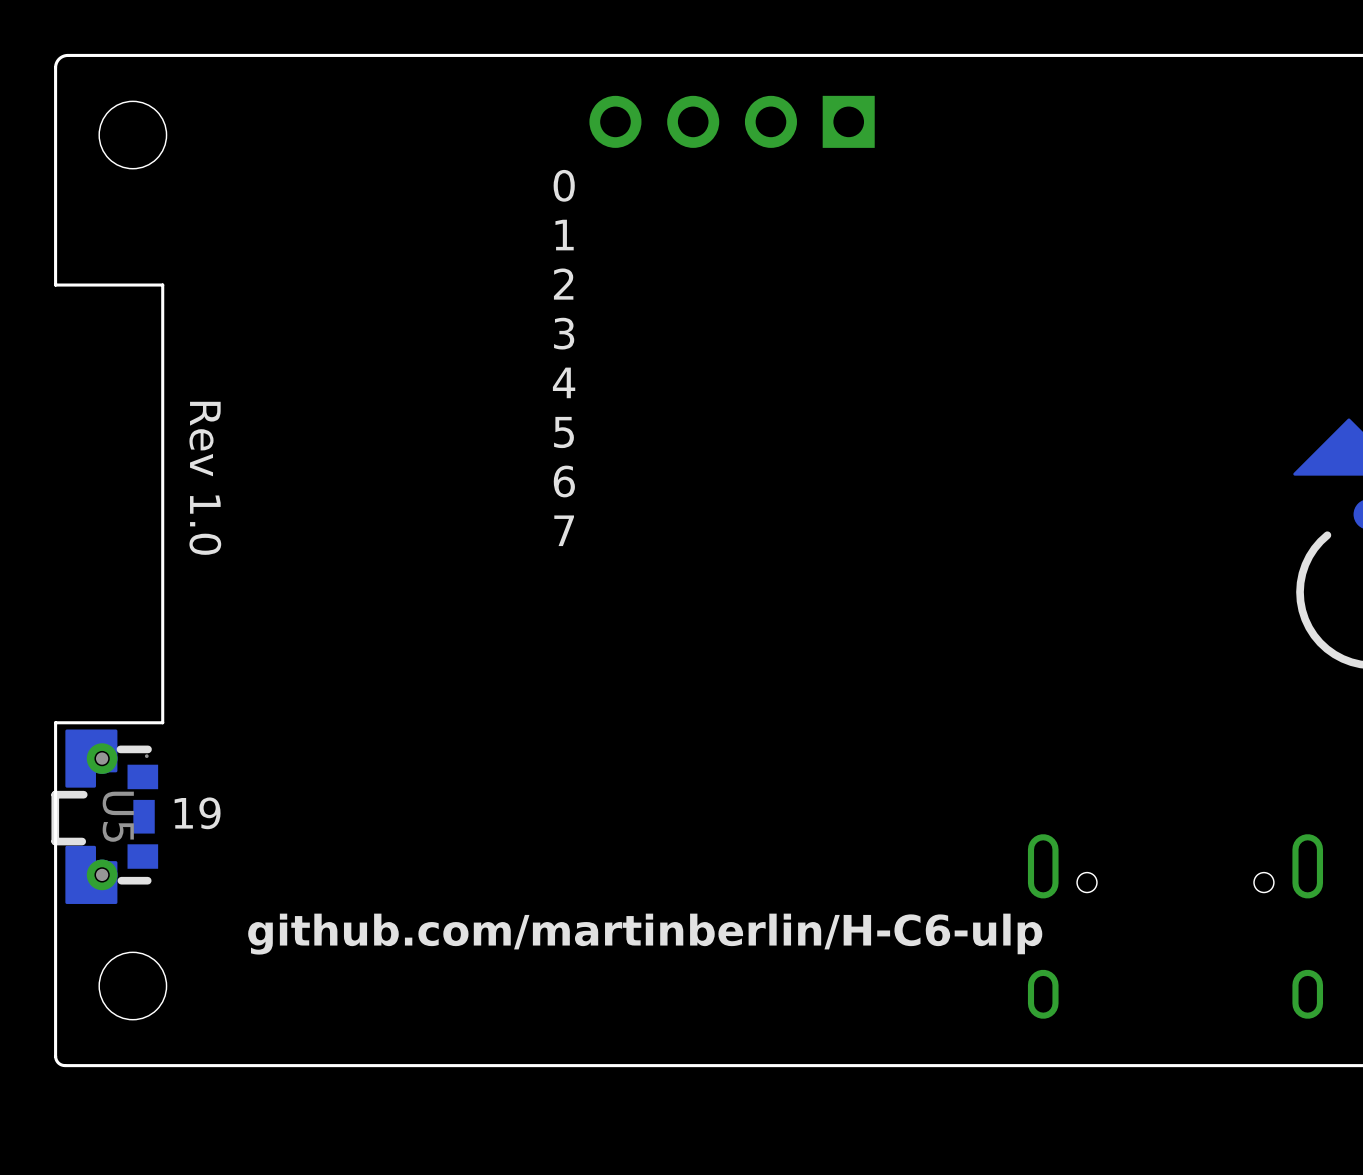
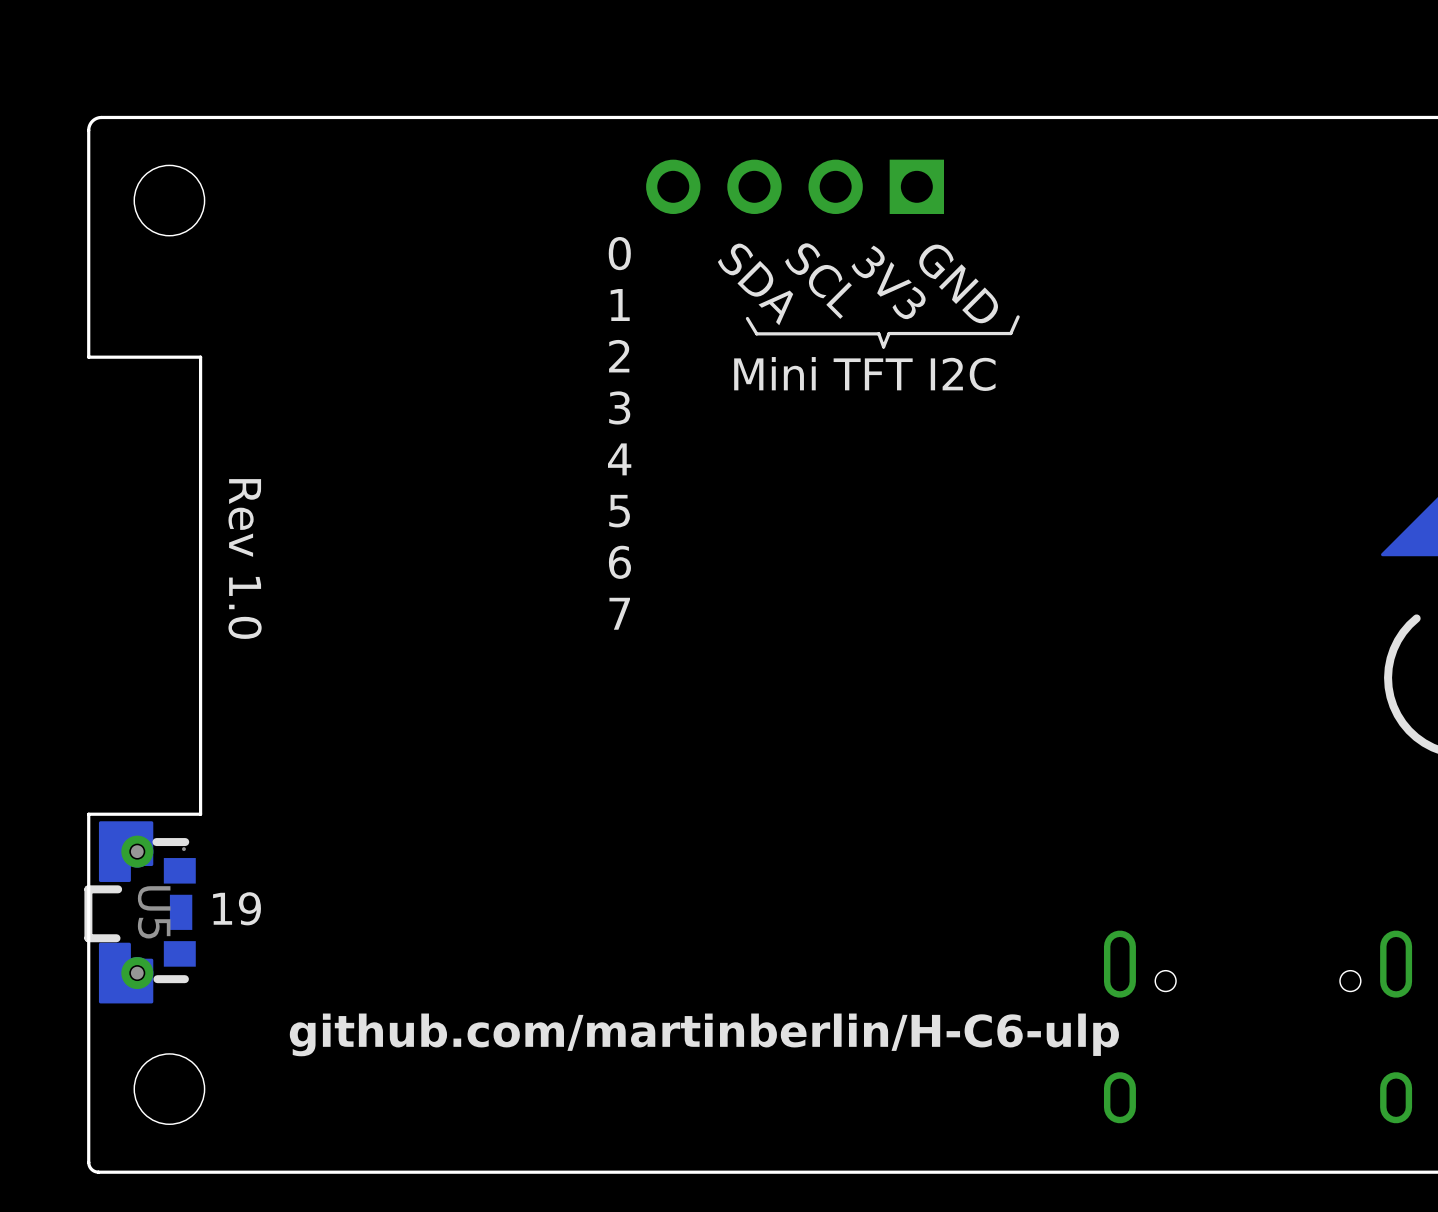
text: none -> SCL (818, 280)
text: none -> 3V3 (888, 282)
text: none -> GND (958, 284)
text: none -> SDA (755, 284)
line: none -> (1018, 316) (1010, 333) (889, 333) (883, 346) (878, 333) (756, 333) (747, 318)
text: none -> Mini TFT I2C (864, 374)

